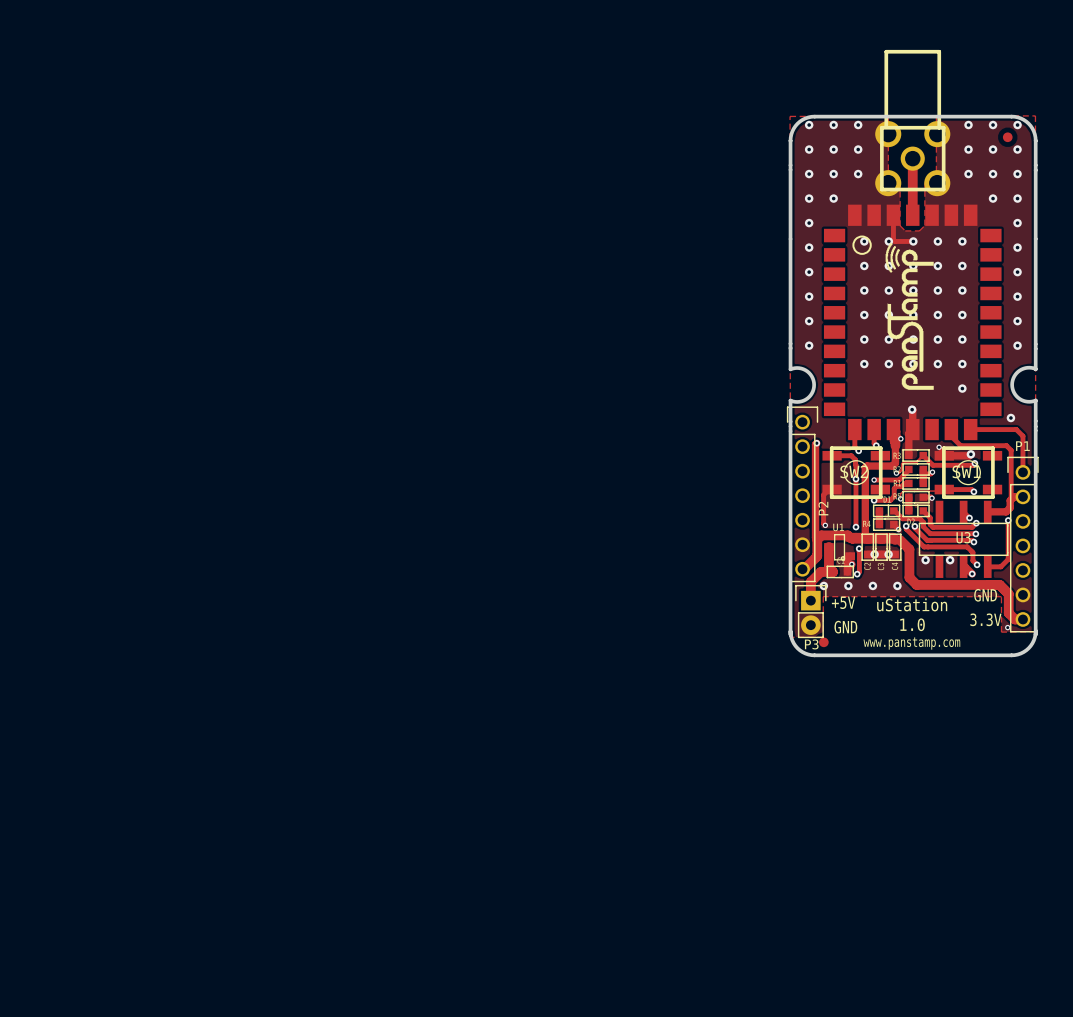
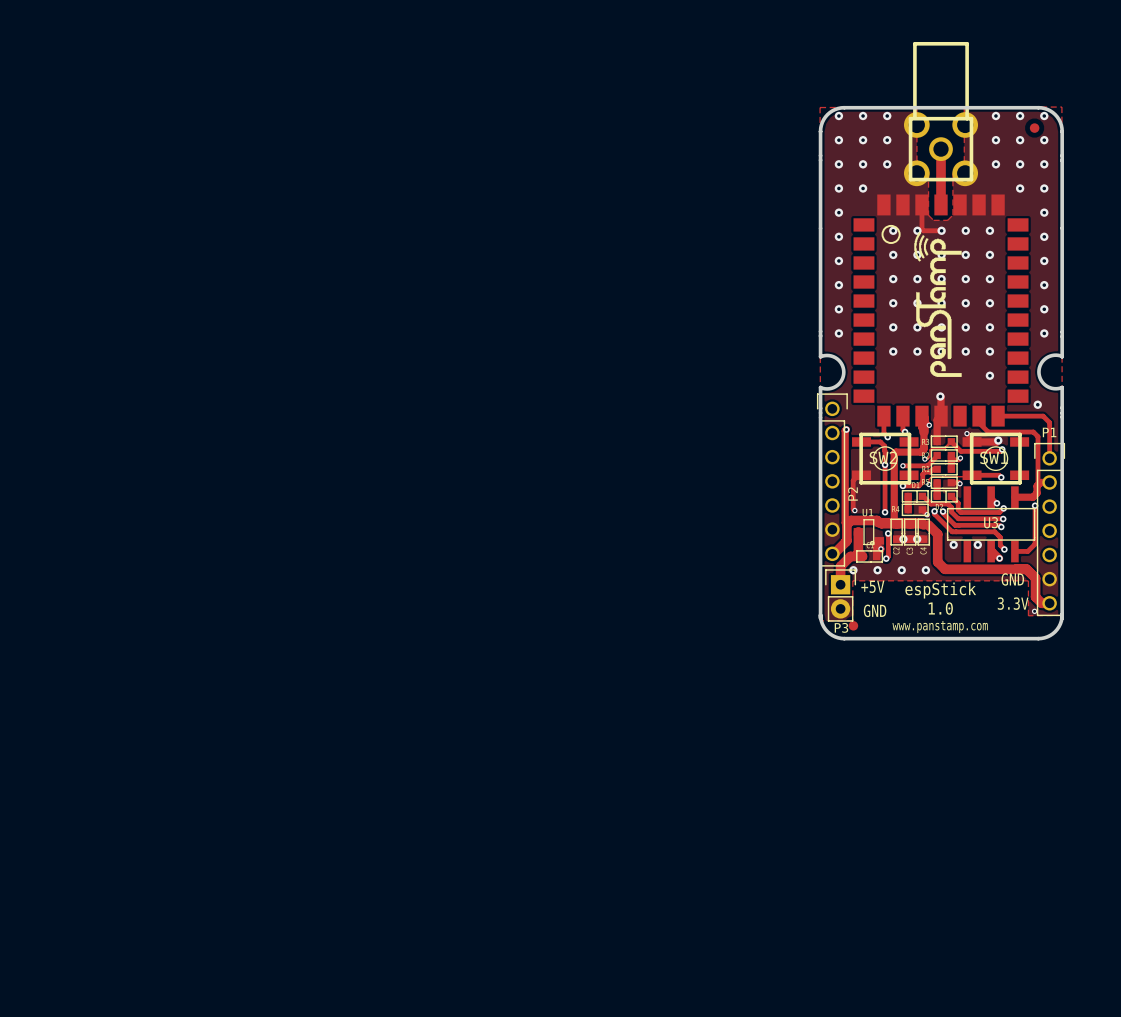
text: uStation (912, 604) -> espStick (940, 590)

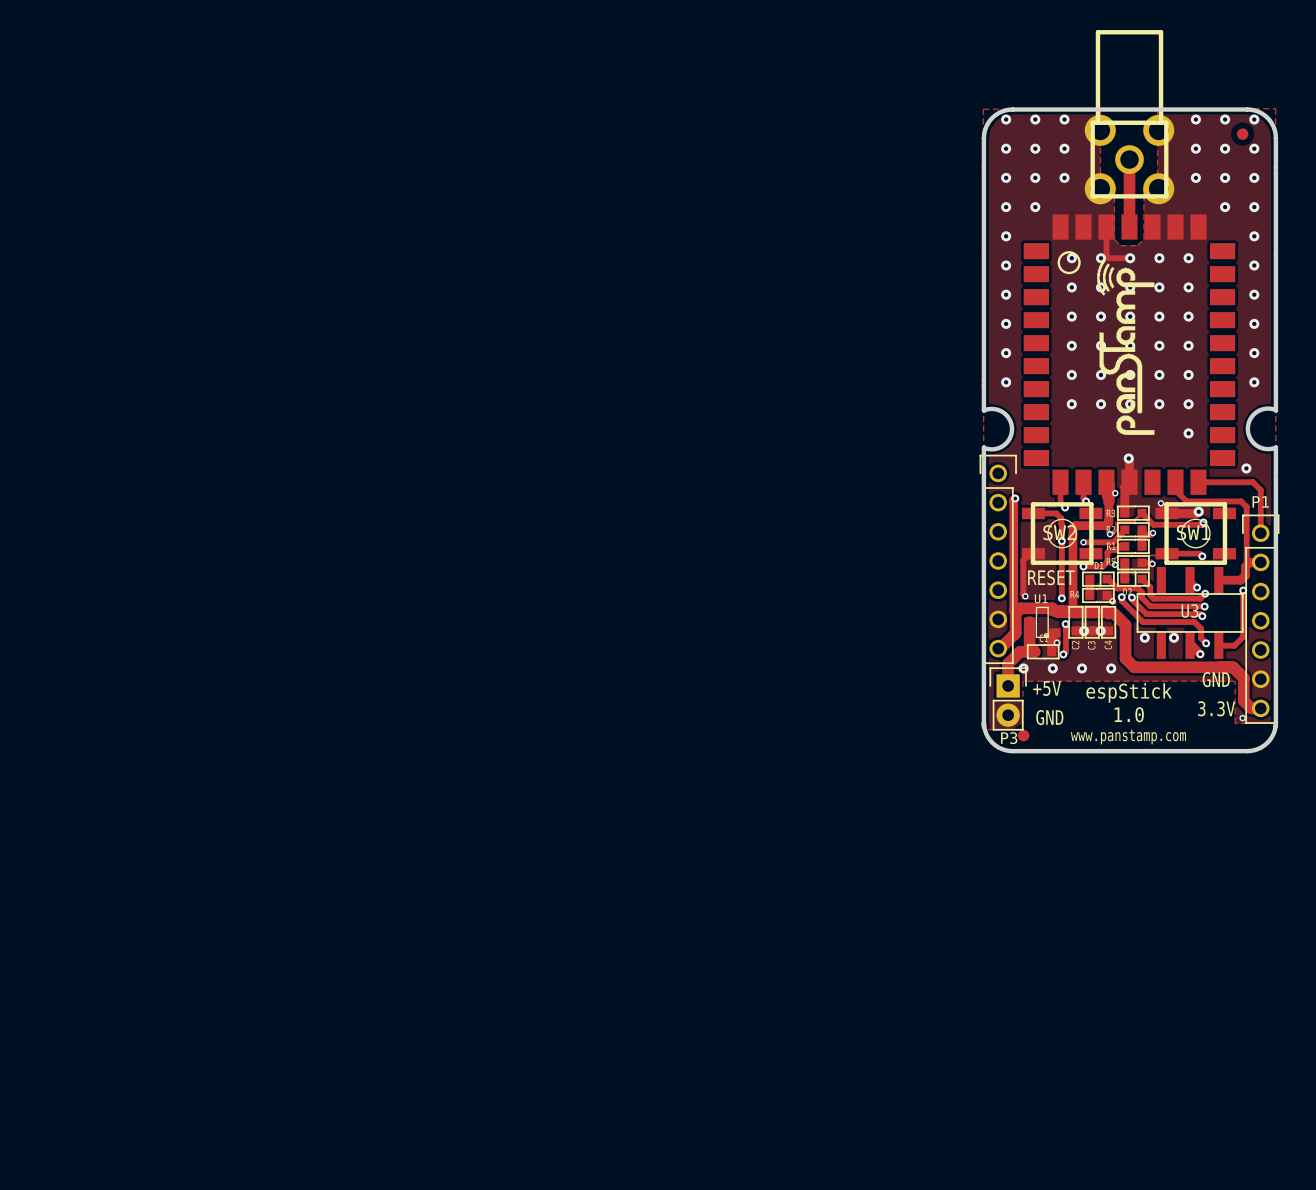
P2 name: P2 (852, 494) -> none
text: none -> RESET (1051, 577)

